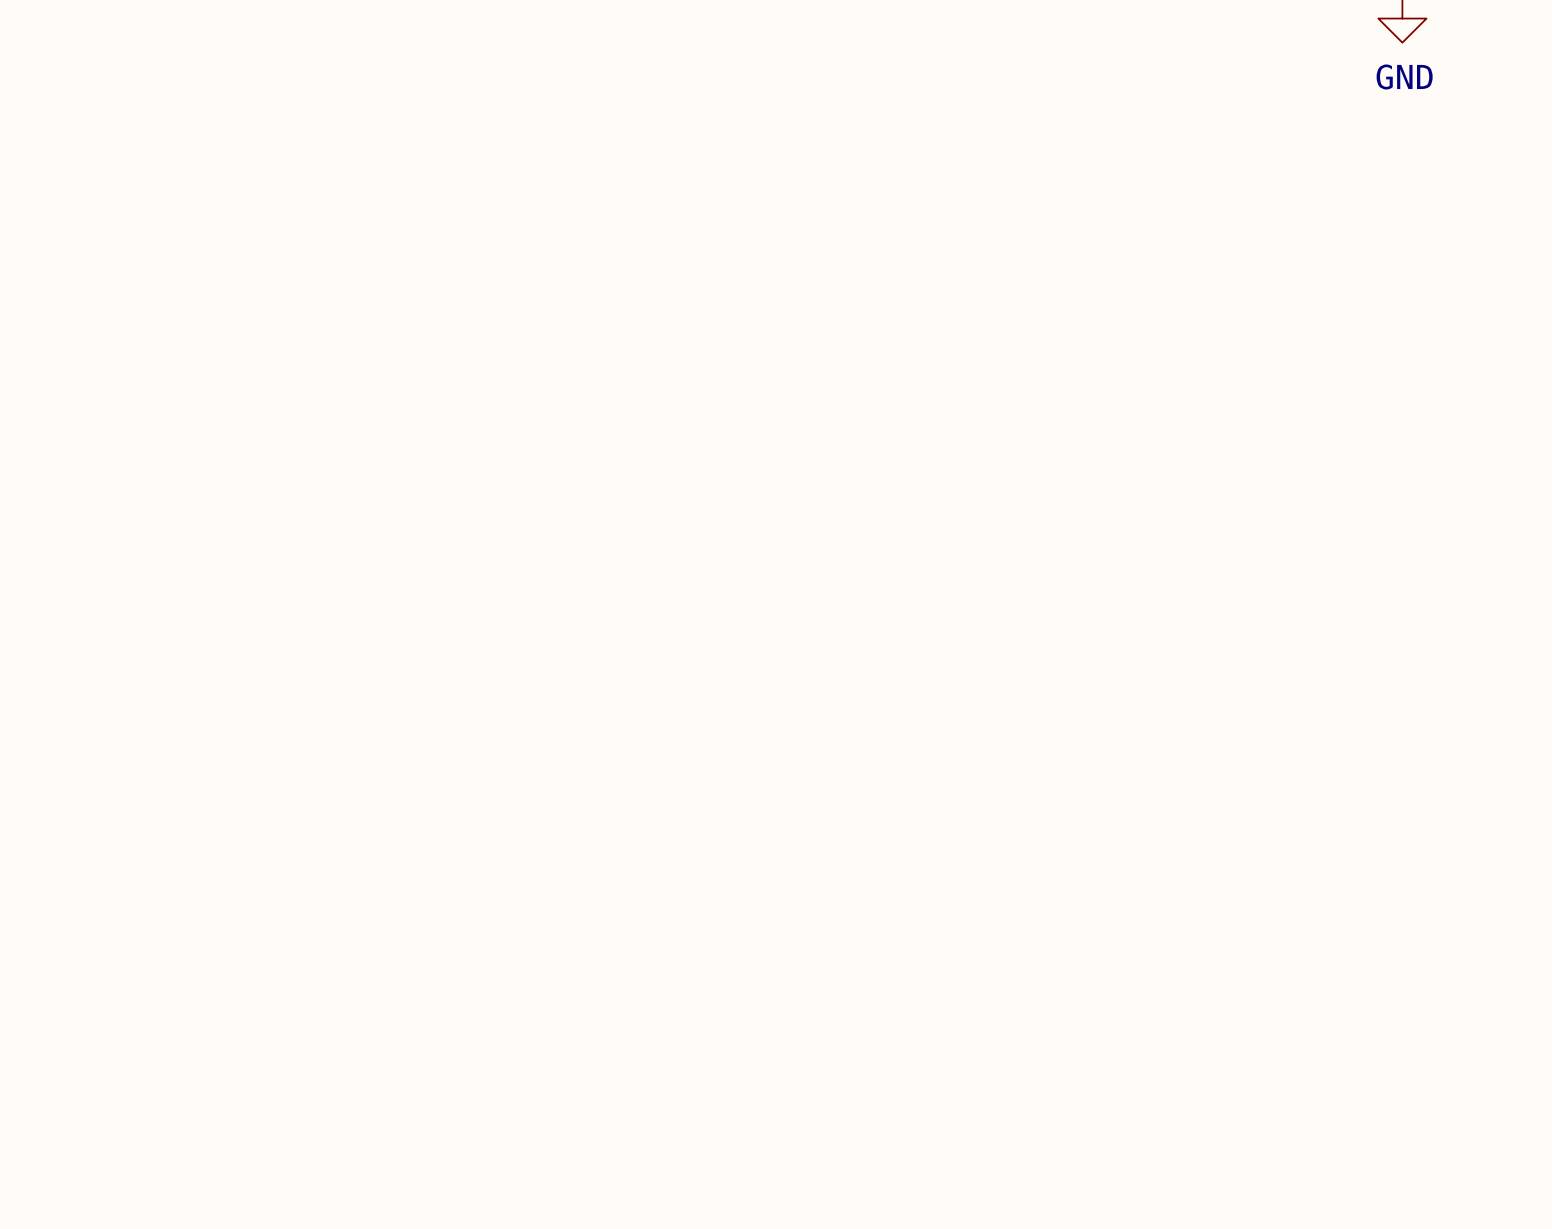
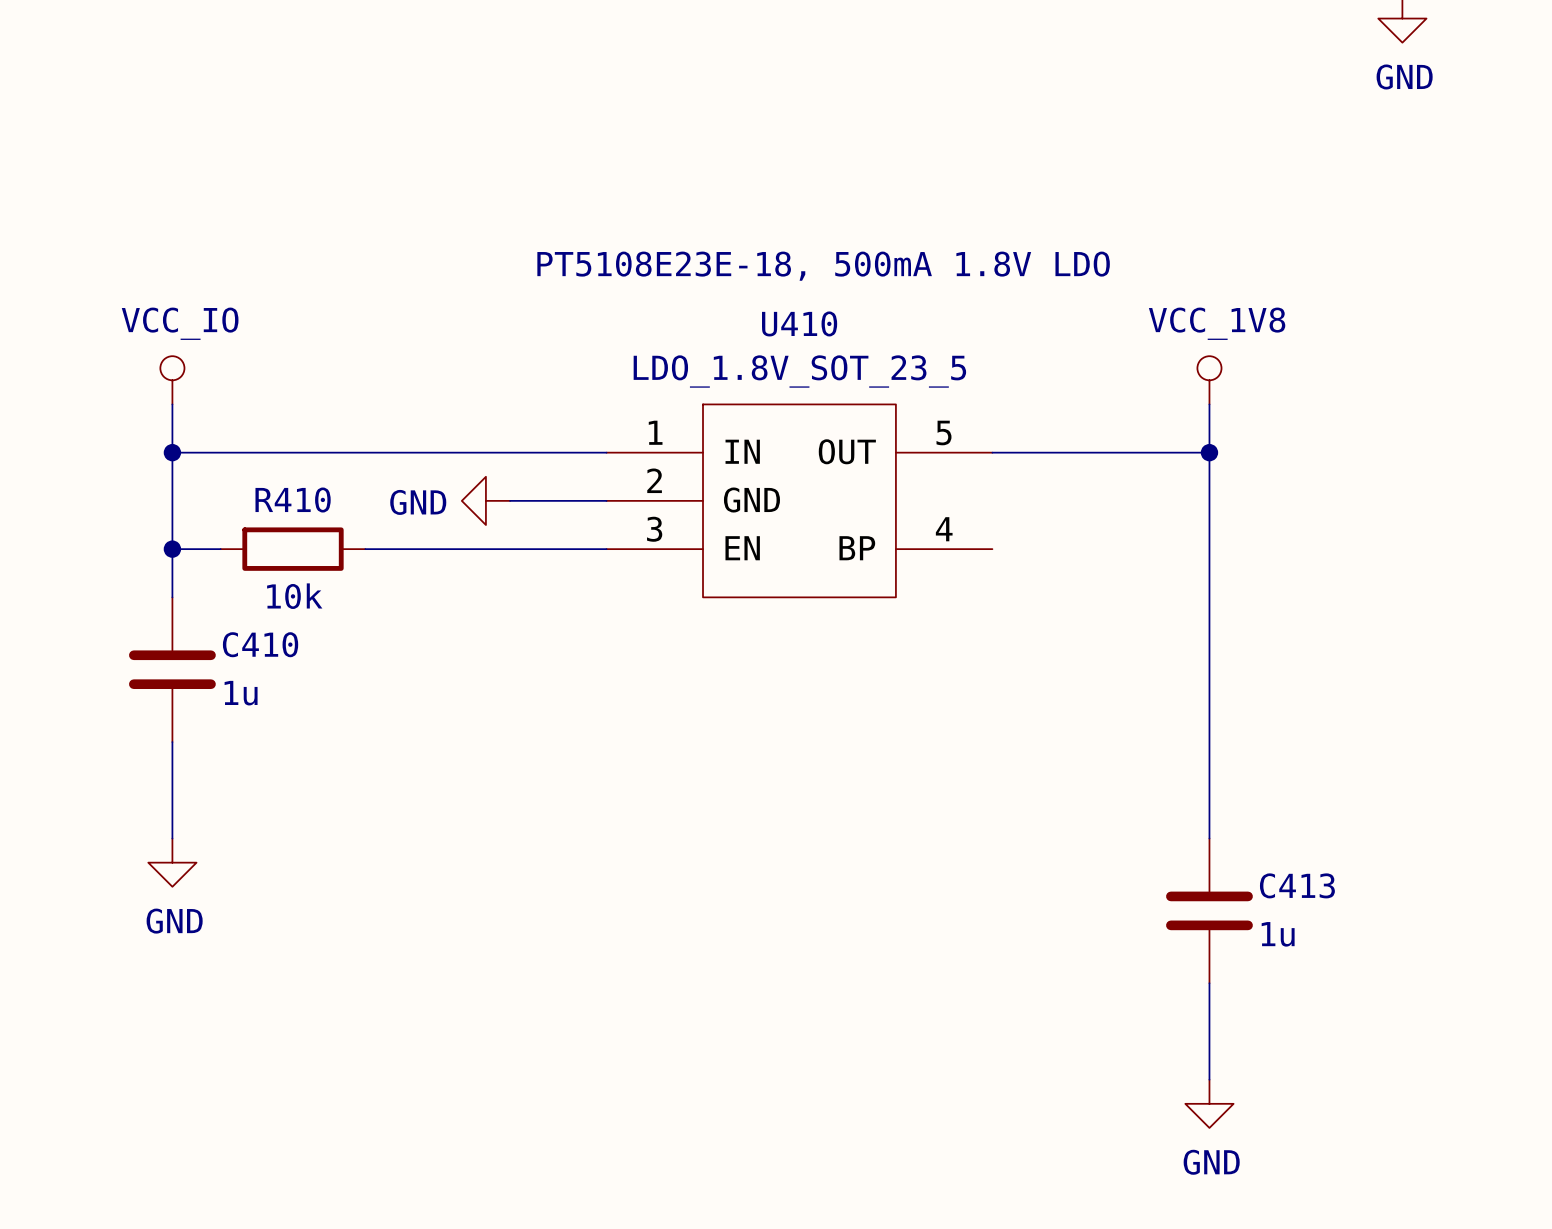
text: none -> PT5108E23E-18, 500mA 1.8V LDO (823, 266)
power symbol: none -> VCC_IO (172, 380)
power symbol: none -> VCC_1V8 (1209, 380)
wire: none -> (172, 404) (172, 597)
wire: none -> (1209, 404) (1209, 838)
wire: none -> (172, 452) (606, 452)
junction: none -> (172, 452)
wire: none -> (992, 452) (1209, 452)
junction: none -> (1209, 452)
power symbol: none -> GND (485, 500)
wire: none -> (510, 500) (606, 500)
U410: none -> LDO_1.8V_SOT_23_5 (799, 500)
wire: none -> (172, 549) (220, 549)
junction: none -> (172, 549)
R410: none -> 10k (293, 549)
wire: none -> (365, 549) (606, 549)
C410: none -> 1u (172, 669)
wire: none -> (172, 742) (172, 838)
power symbol: none -> GND (172, 862)
C413: none -> 1u (1209, 910)
wire: none -> (1209, 983) (1209, 1079)
power symbol: none -> GND (1209, 1103)

